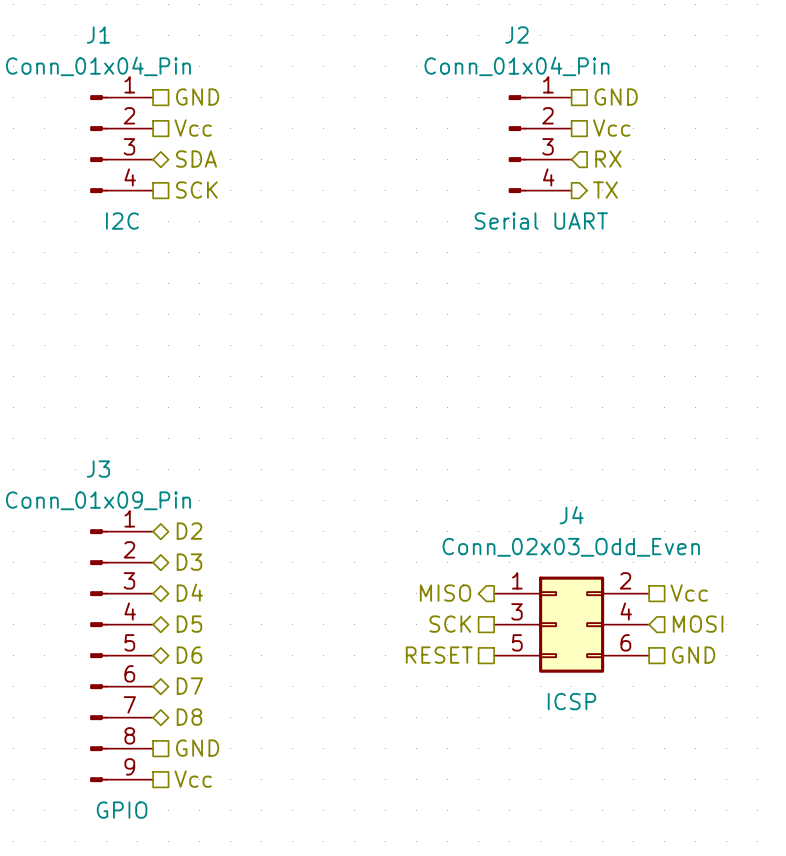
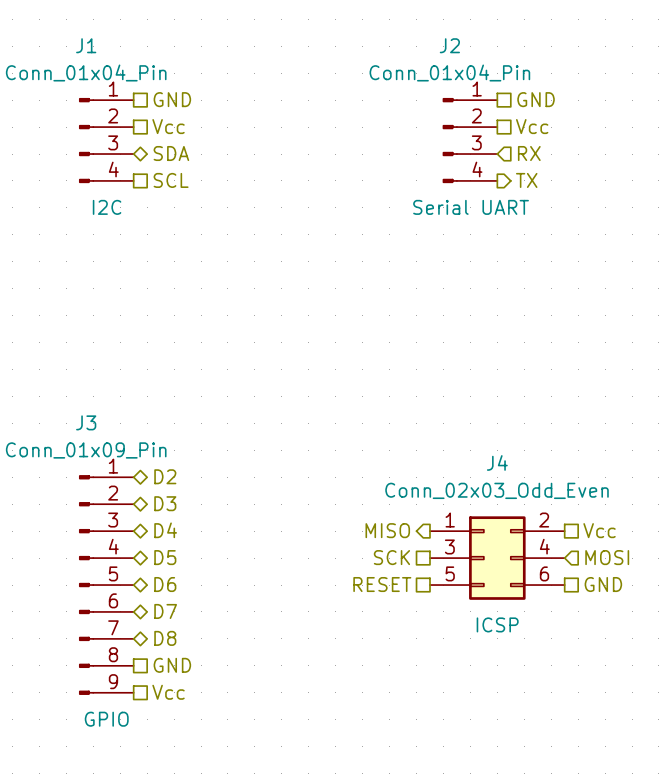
hierarchical label: SCK (196, 190) -> SCL (171, 180)

